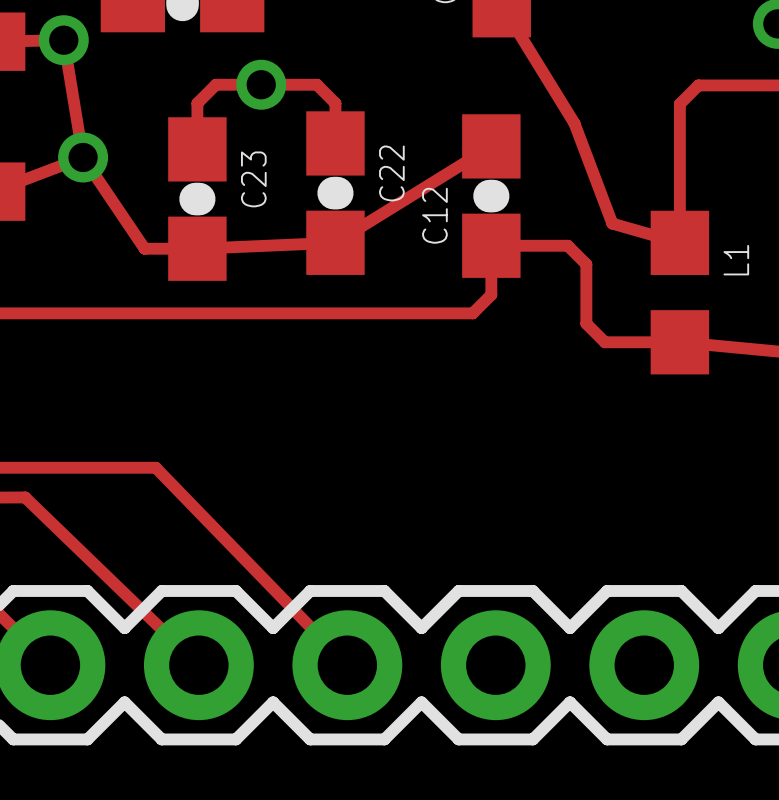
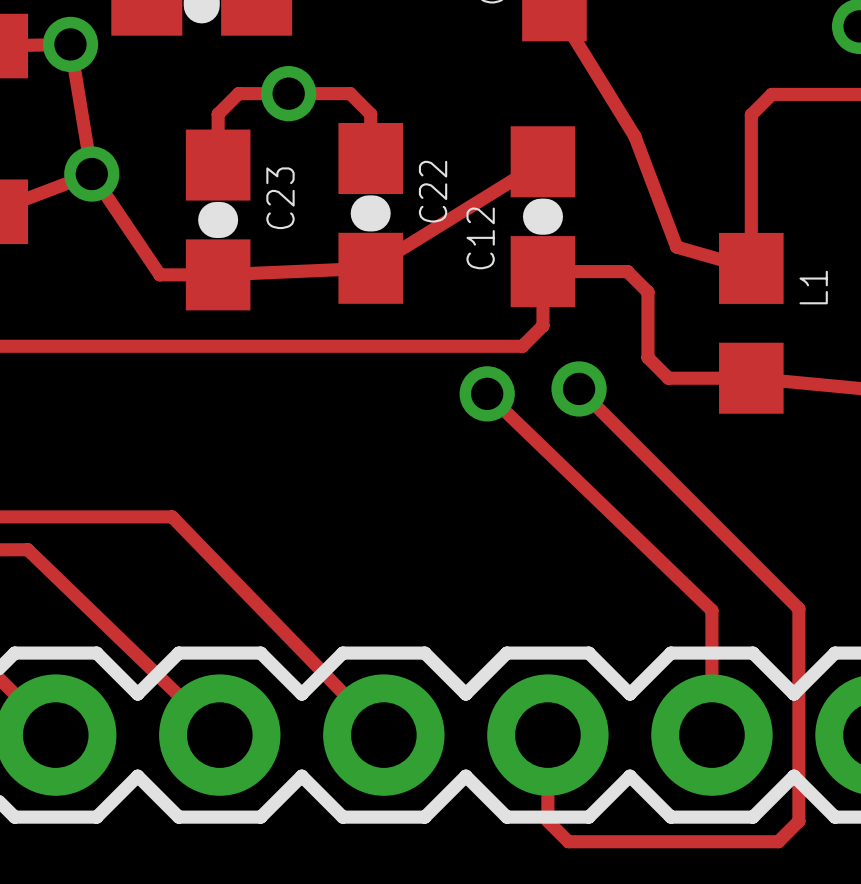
track: none -> (579, 388) (798, 608) (798, 821) (778, 841) (568, 841) (547, 821) (547, 735)
via: none -> (579, 388)
track: none -> (487, 393) (711, 610) (711, 735)
via: none -> (487, 393)

